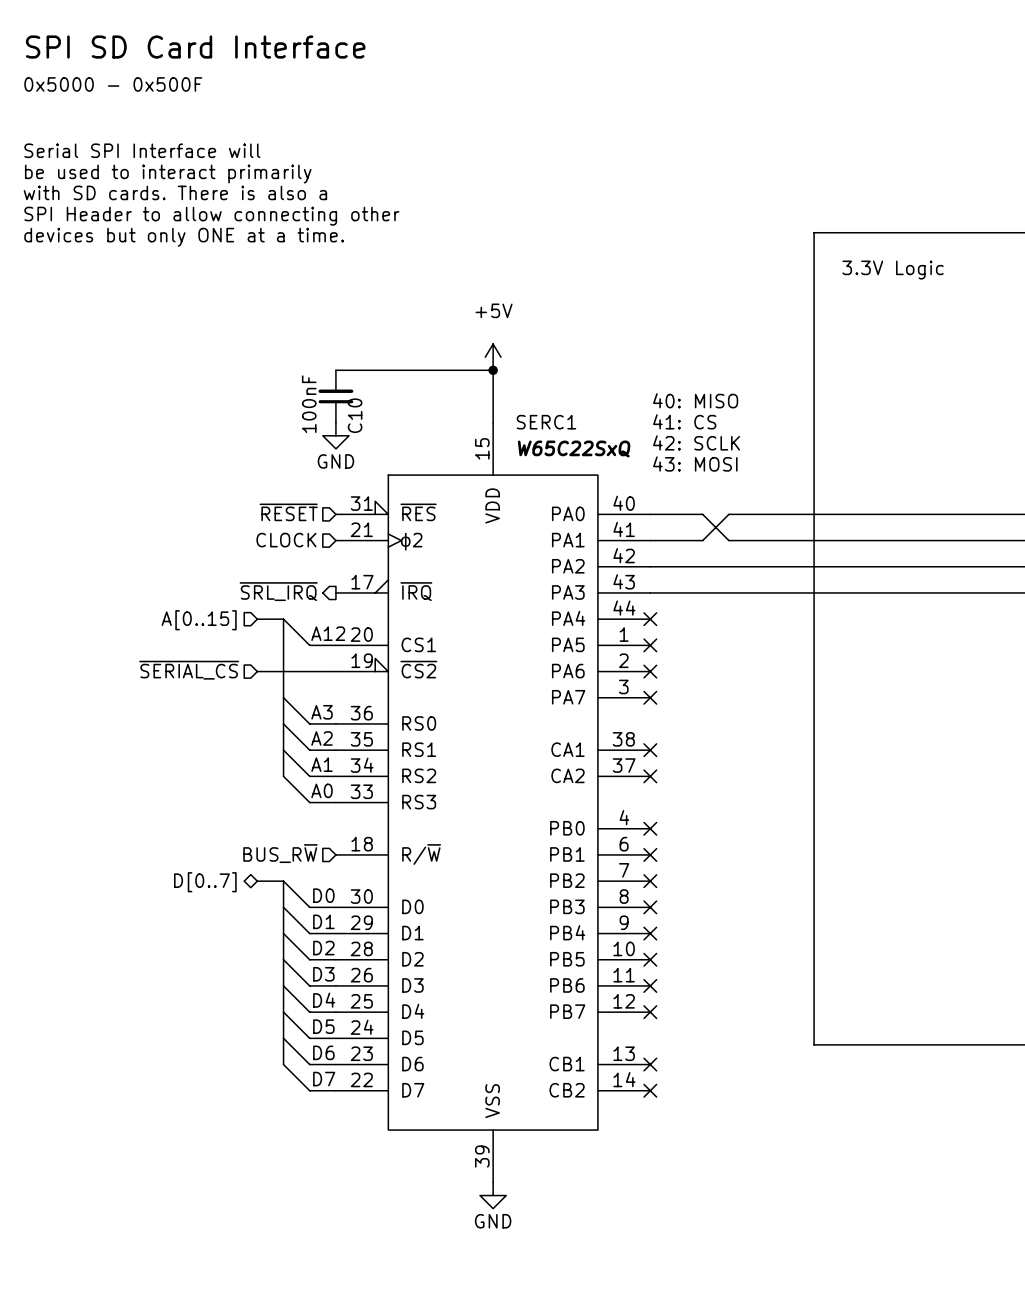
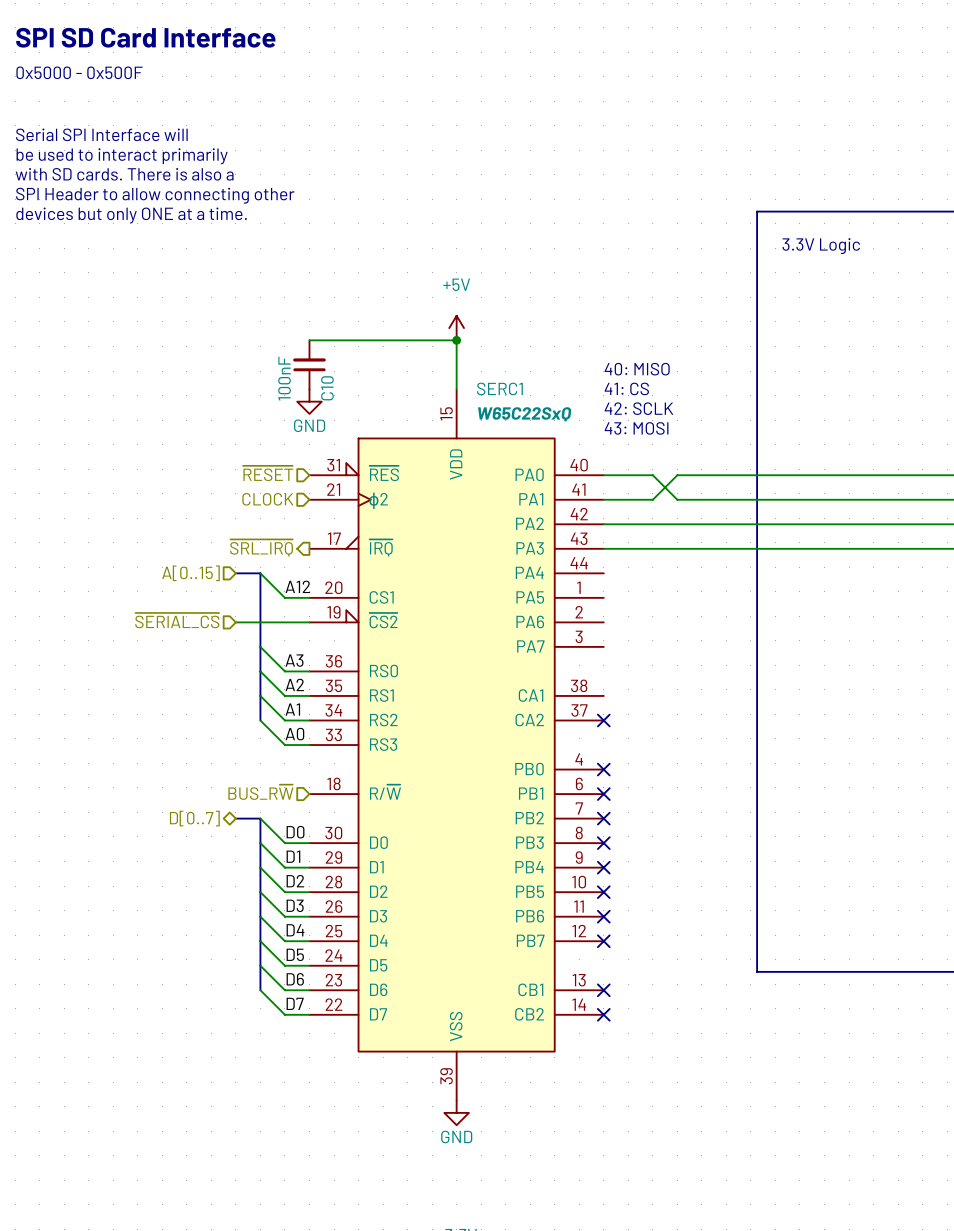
no-connect mark: (650, 619) -> none
no-connect mark: (650, 645) -> none
no-connect mark: (650, 671) -> none
no-connect mark: (650, 697) -> none
no-connect mark: (650, 750) -> none

